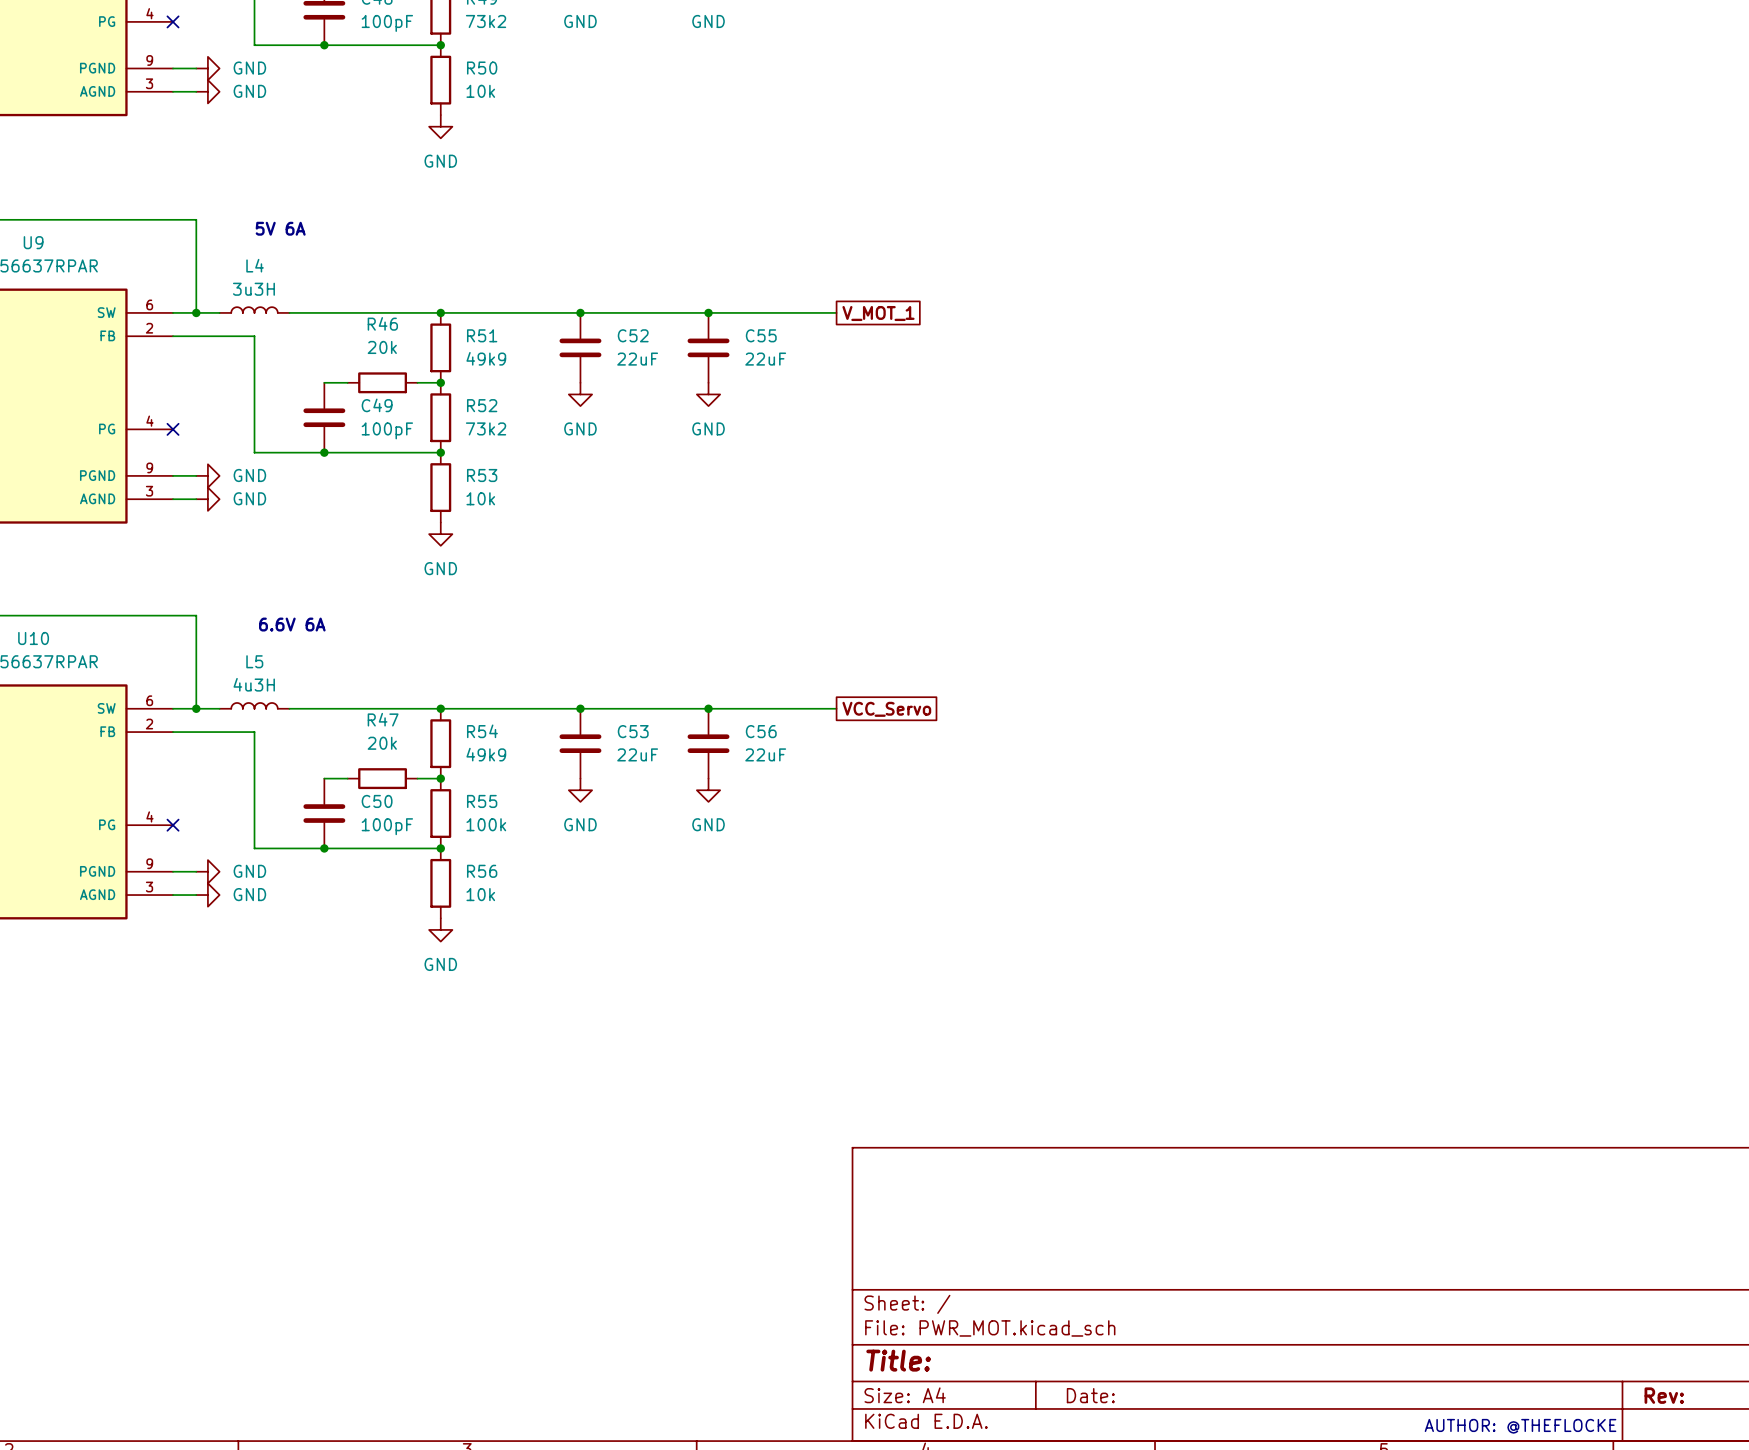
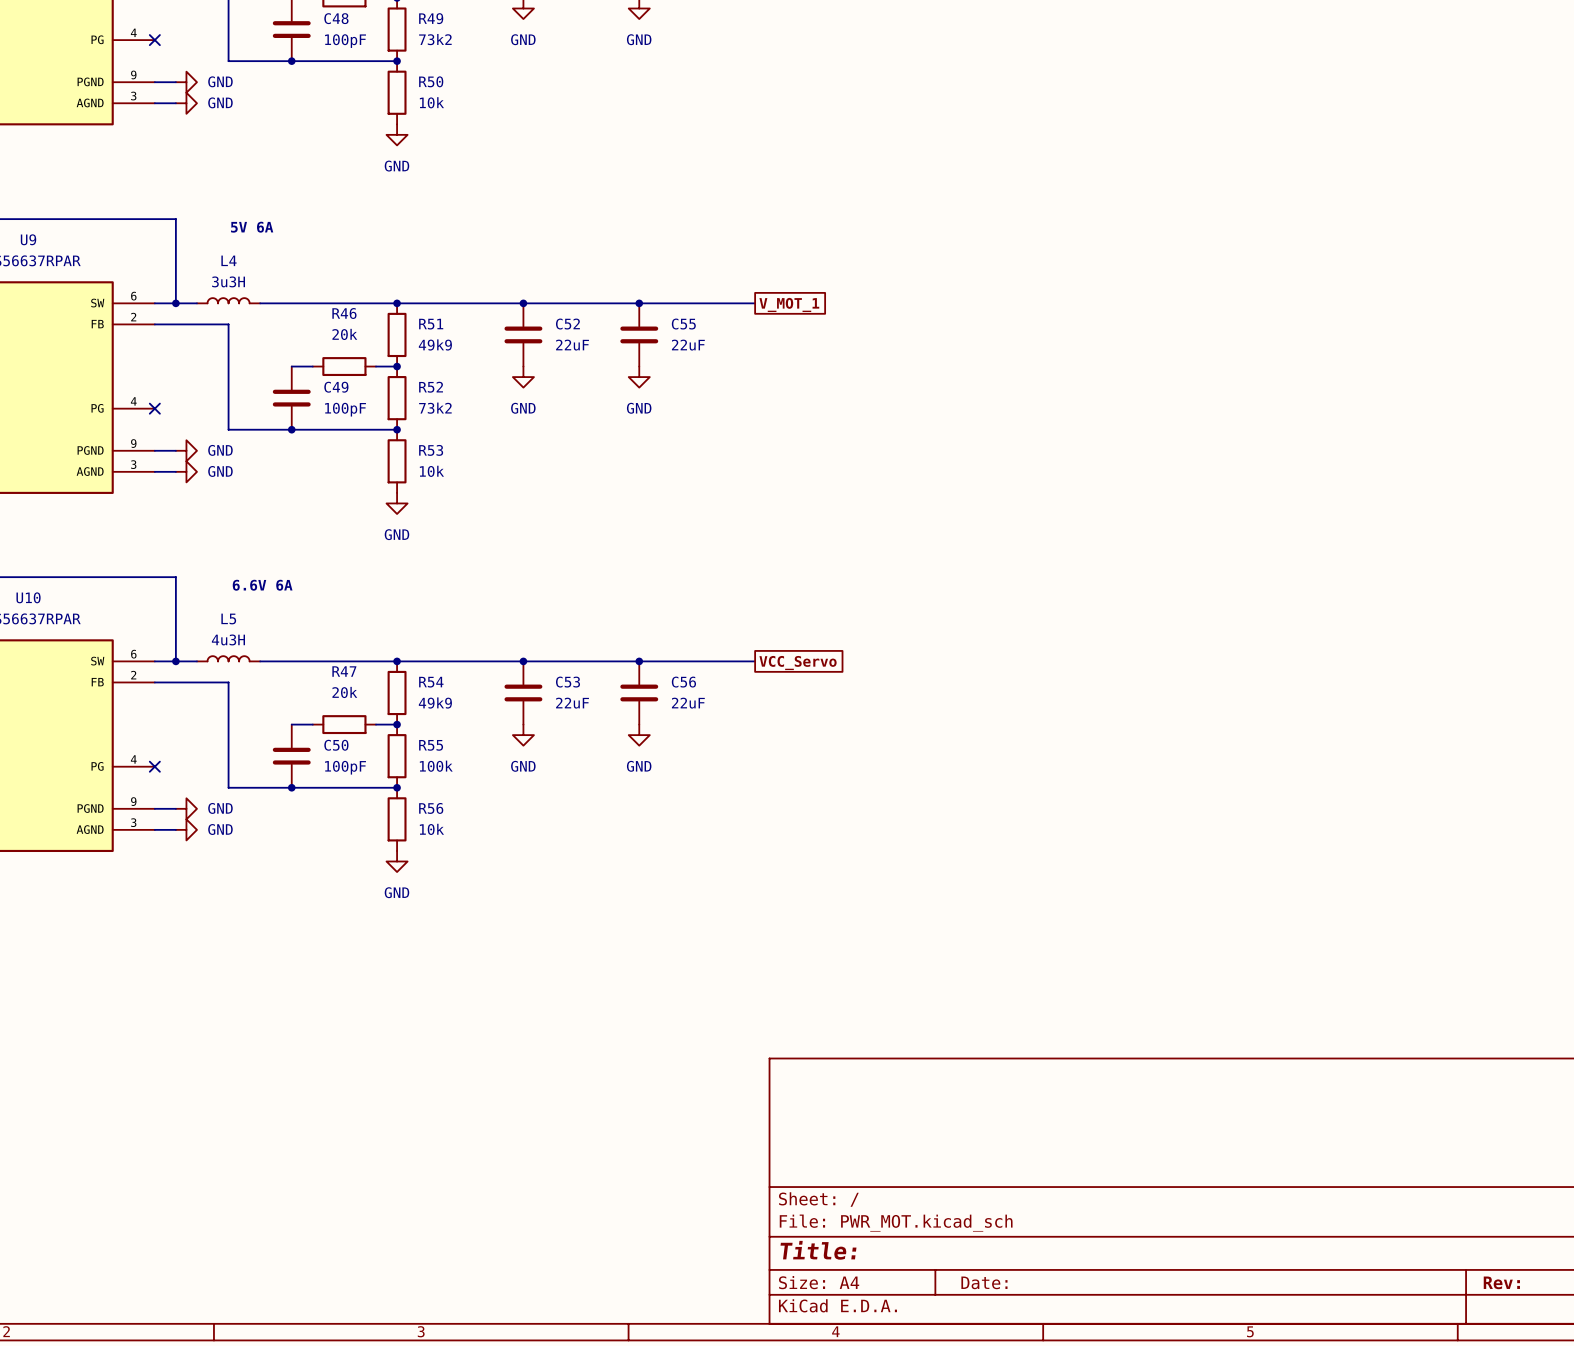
text: AUTHOR: @THEFLOCKE (1520, 1426) -> none

